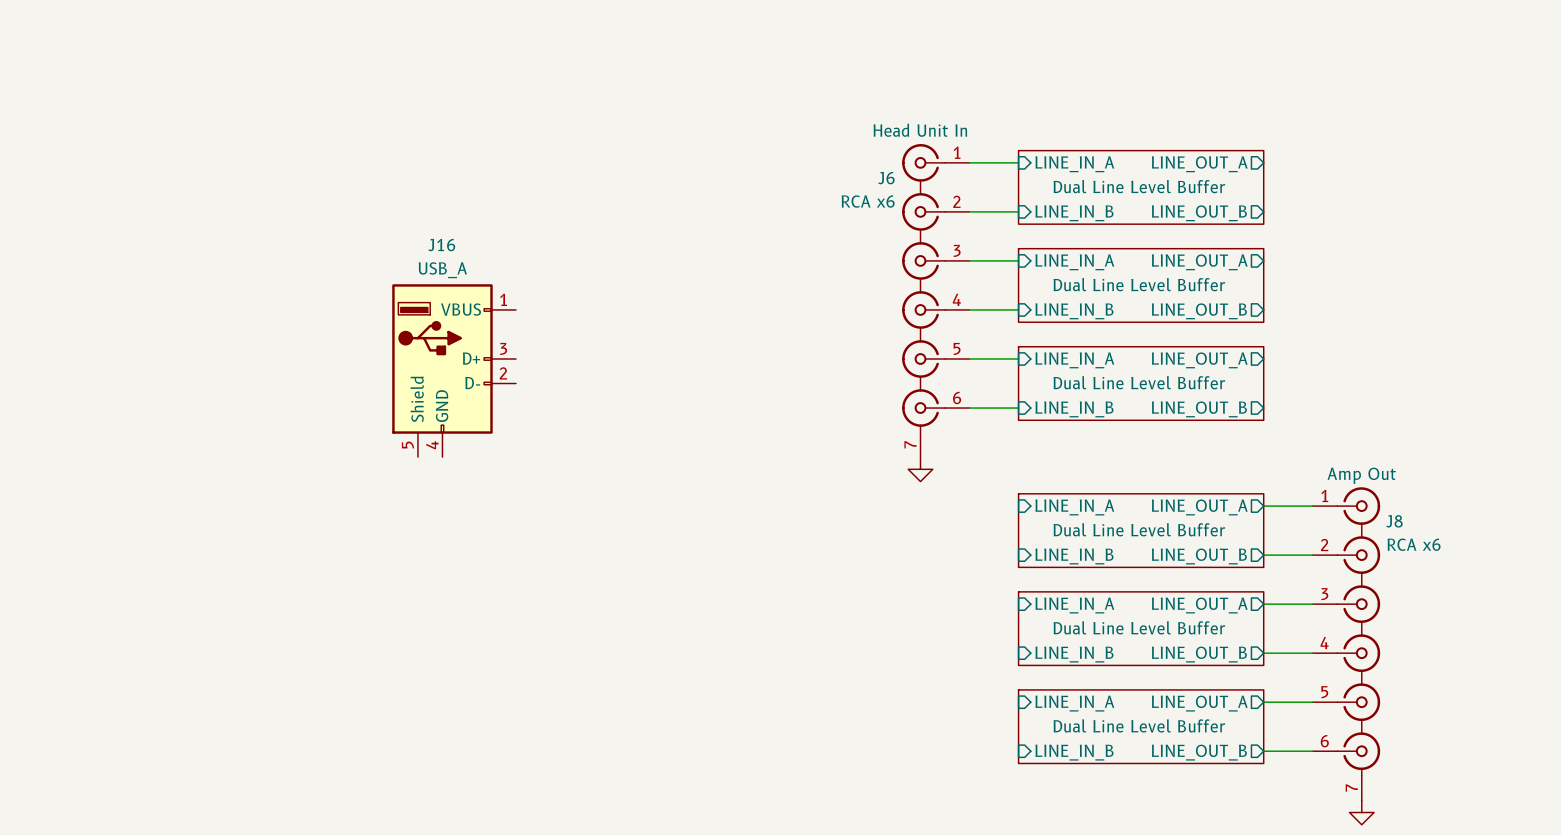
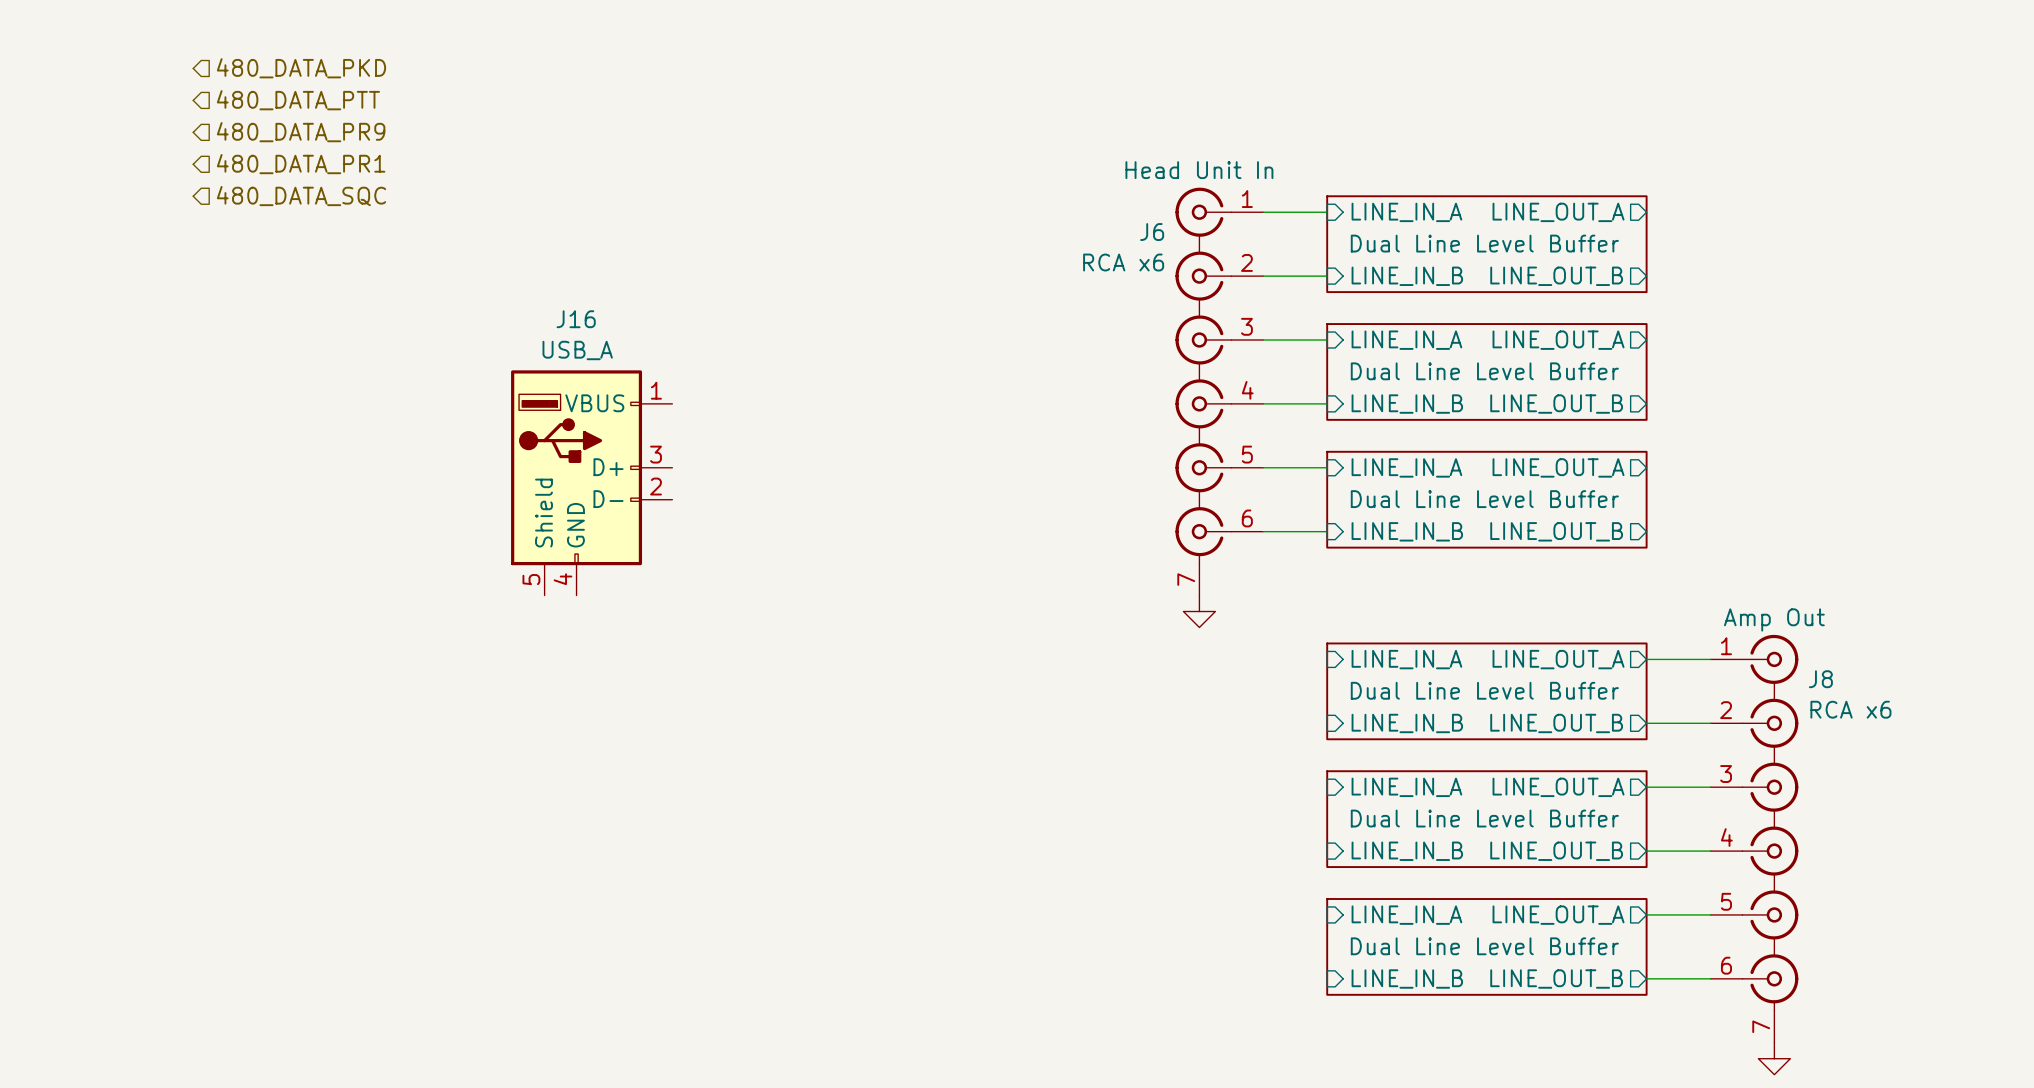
hierarchical label: none -> 480_DATA_PKD (301, 68)
hierarchical label: none -> 480_DATA_PTT (298, 100)
hierarchical label: none -> 480_DATA_PR9 (301, 132)
hierarchical label: none -> 480_DATA_PR1 (301, 164)
hierarchical label: none -> 480_DATA_SQC (301, 196)

